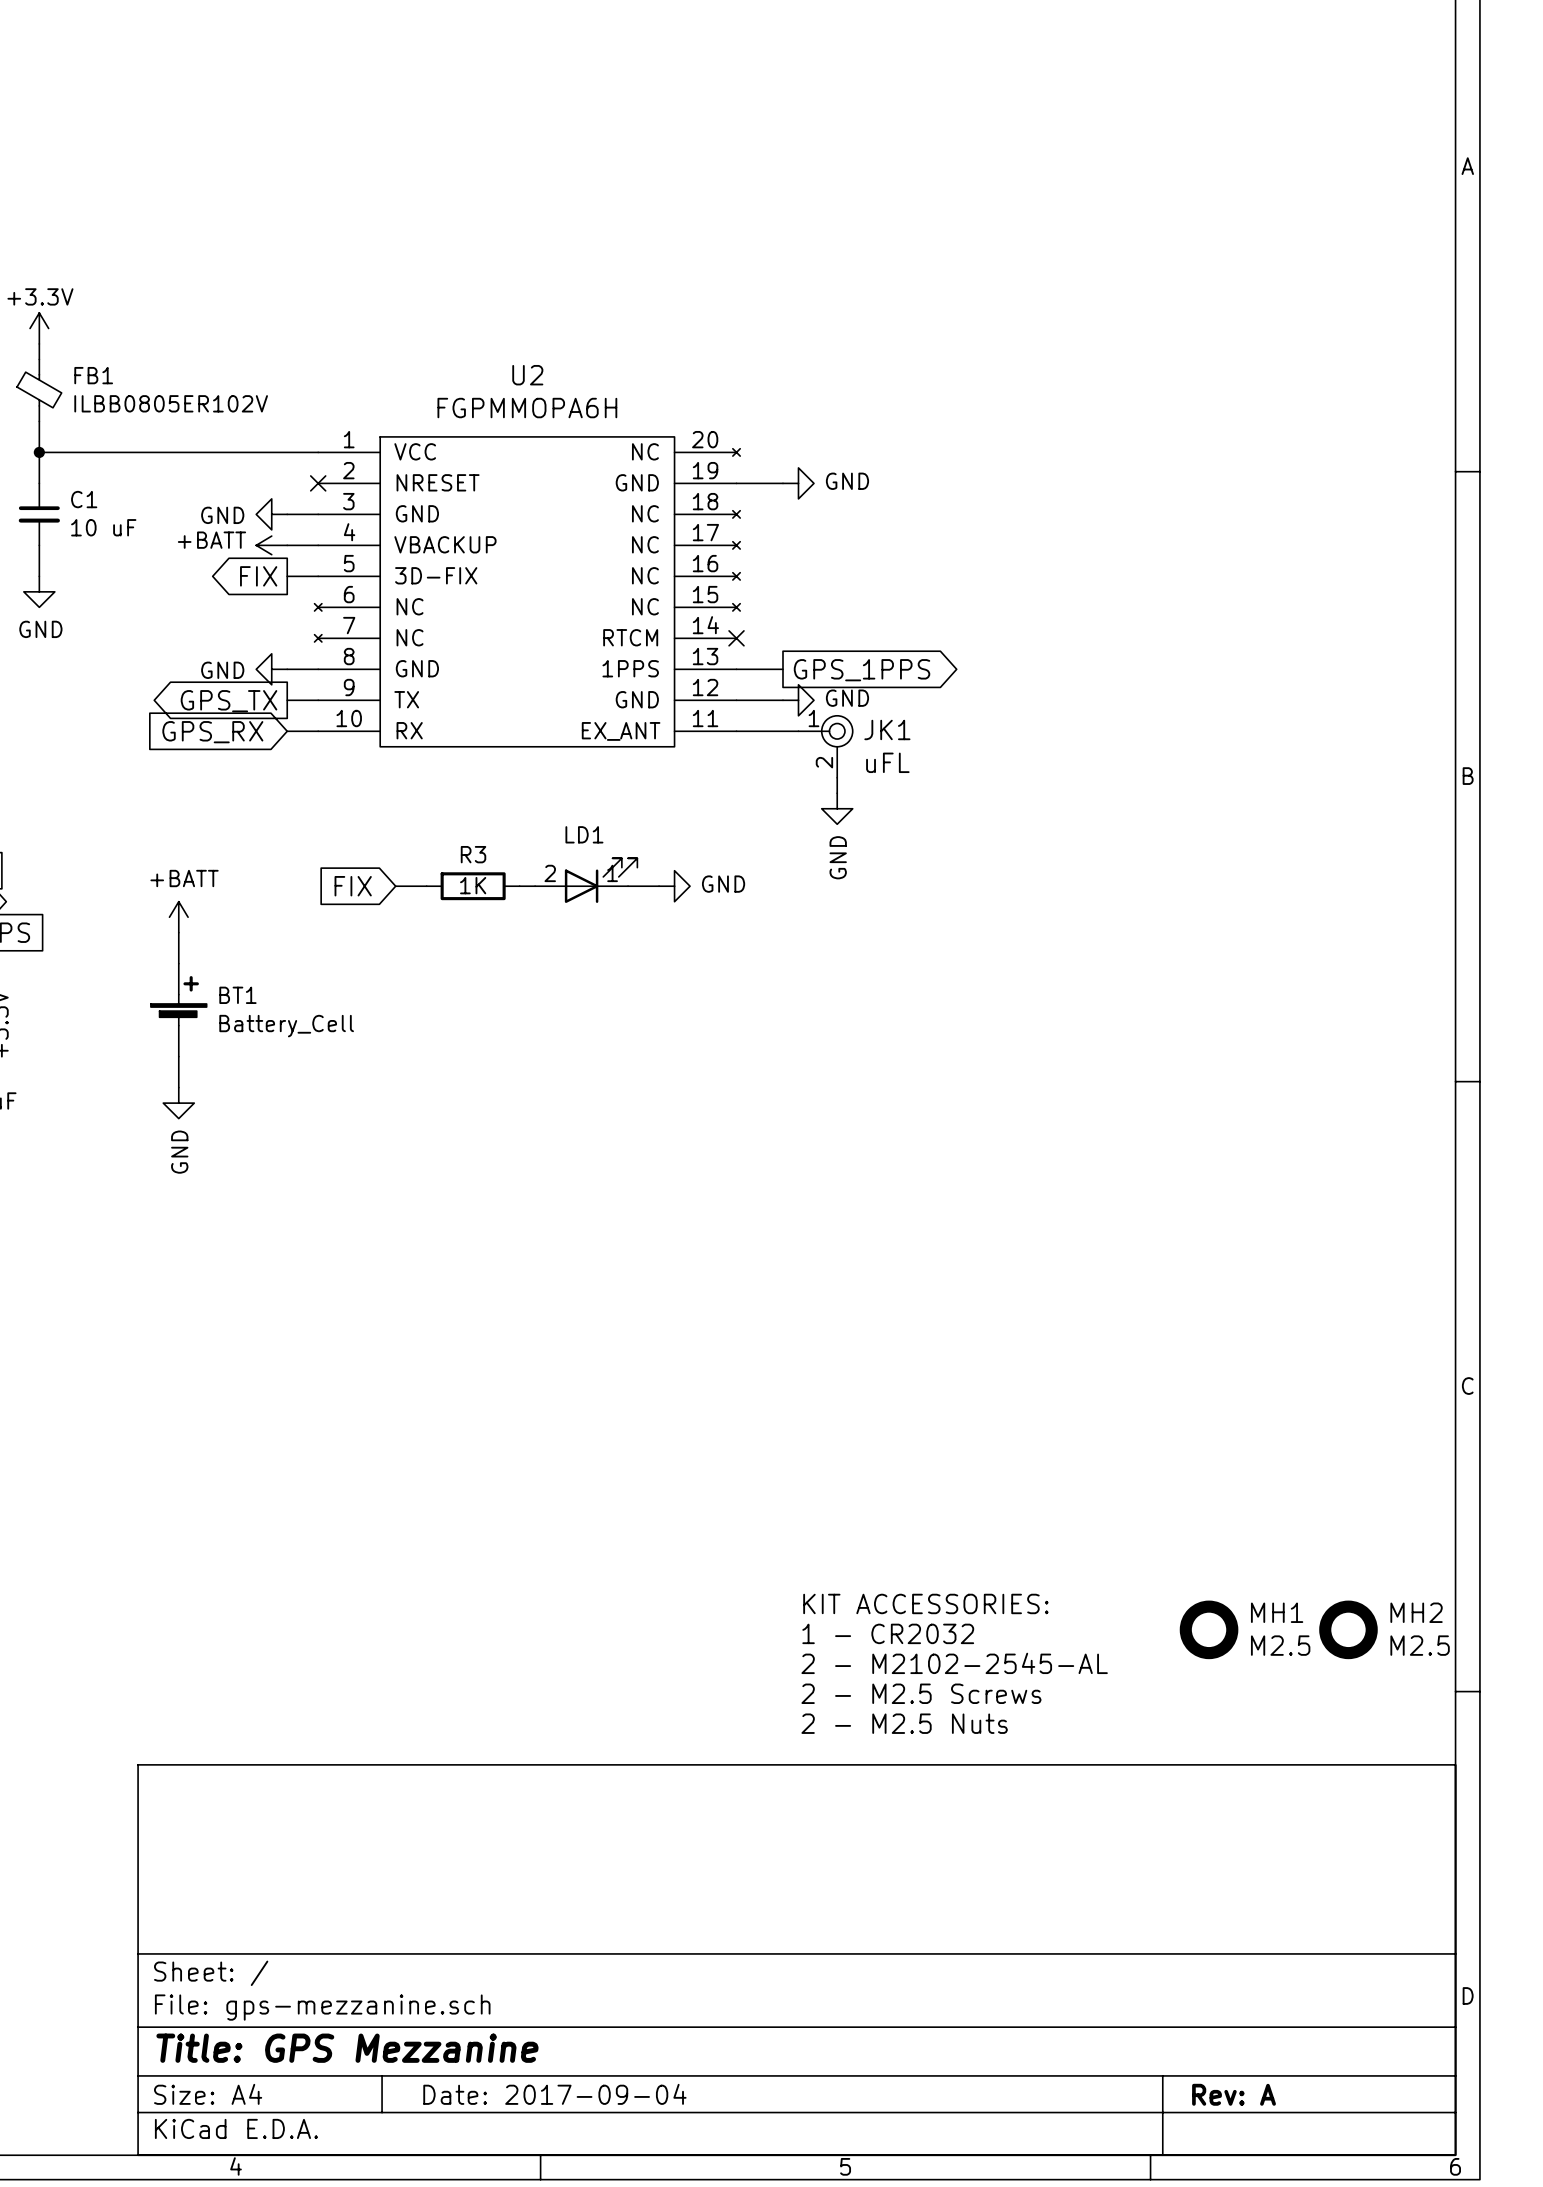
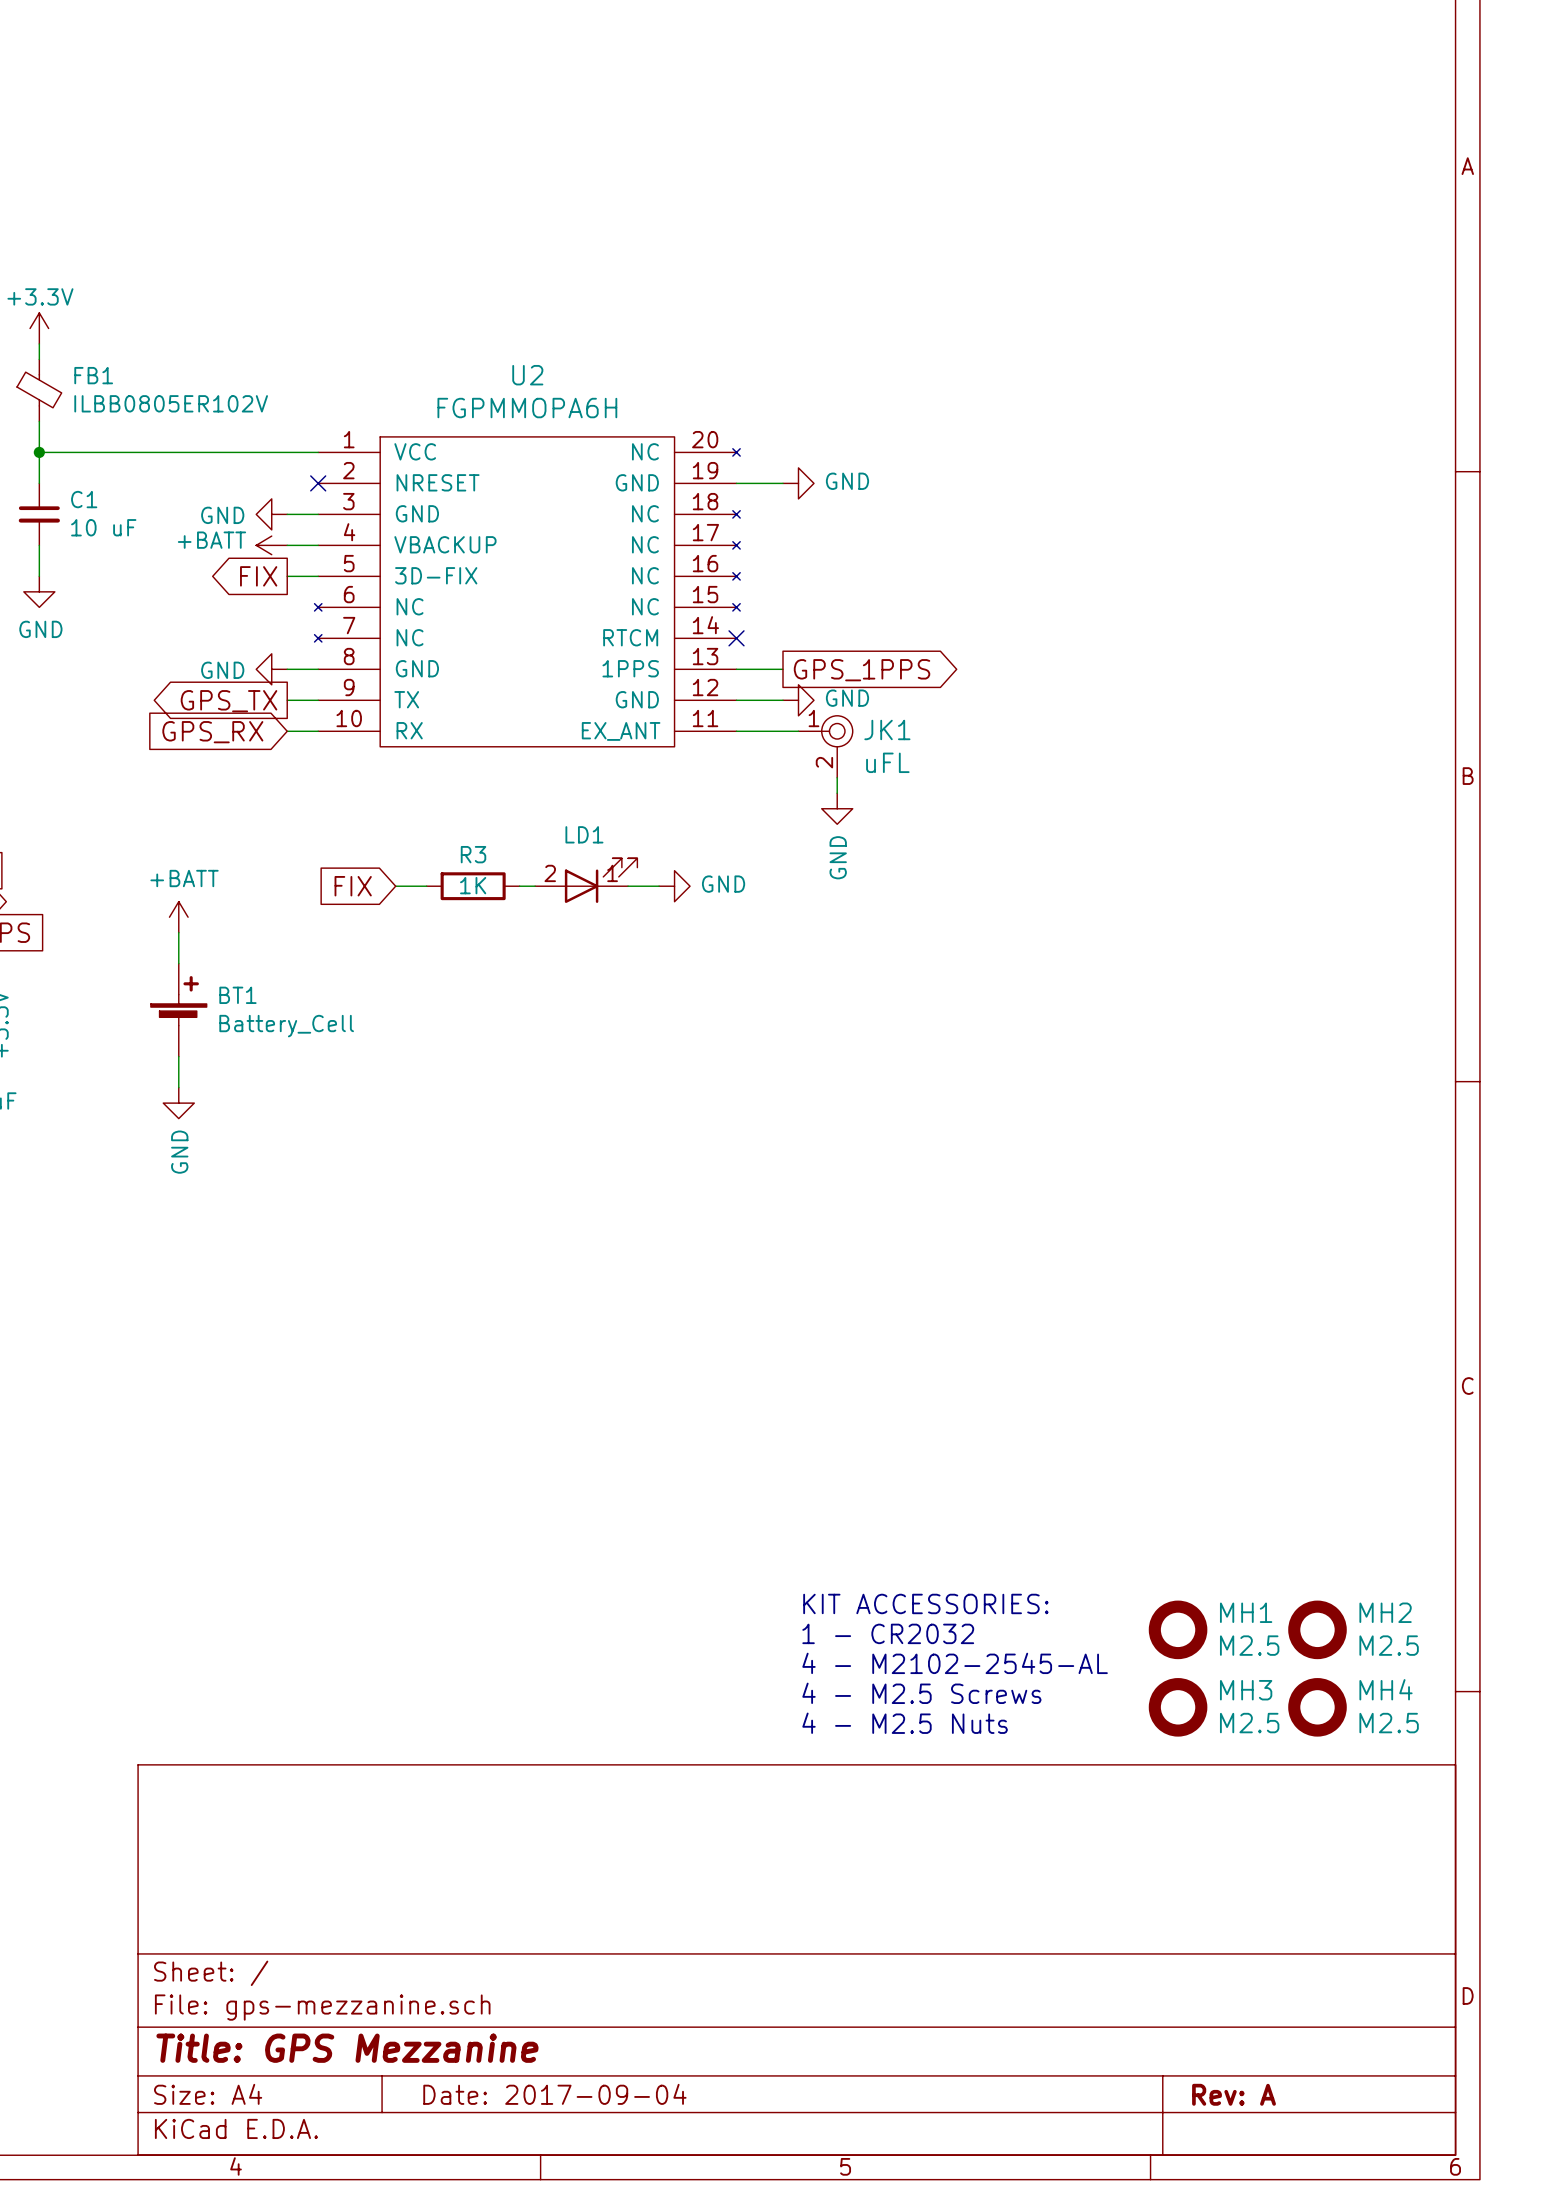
MH1 position: (1209, 1629) -> (1178, 1629)
MH2 position: (1348, 1629) -> (1317, 1629)
text: 2 - M2102-2545-AL (954, 1663) -> 4 - M2102-2545-AL (955, 1663)
text: 2 - M2.5 Screws (921, 1693) -> 4 - M2.5 Screws (921, 1693)
MH3: none -> M2.5 (1178, 1707)
MH4: none -> M2.5 (1317, 1707)
text: 2 - M2.5 Nuts (904, 1723) -> 4 - M2.5 Nuts (905, 1723)

